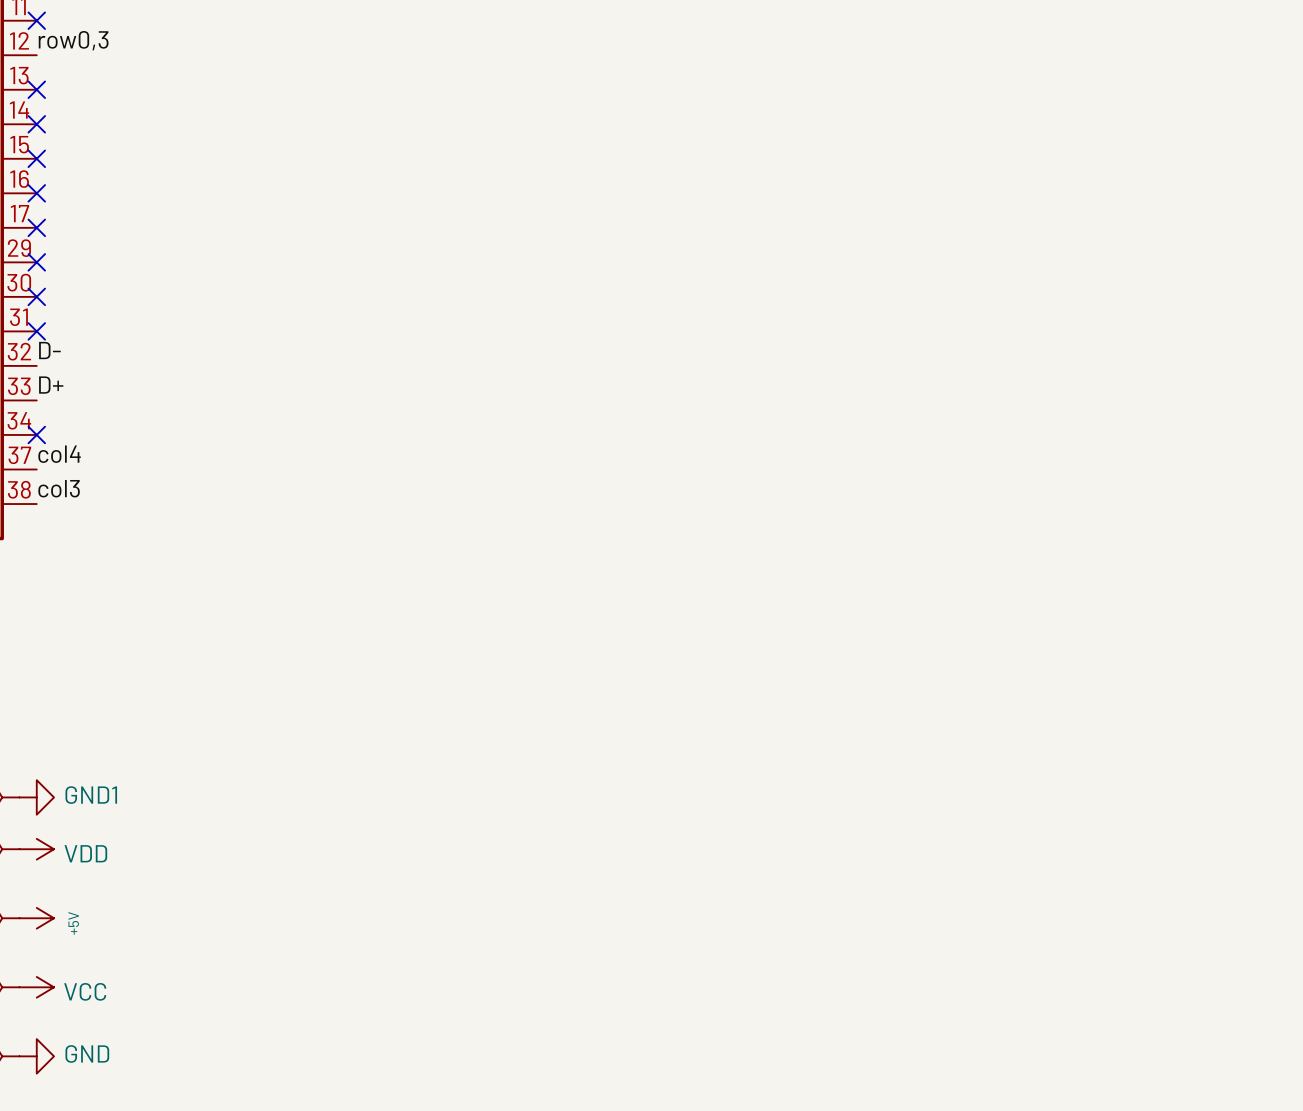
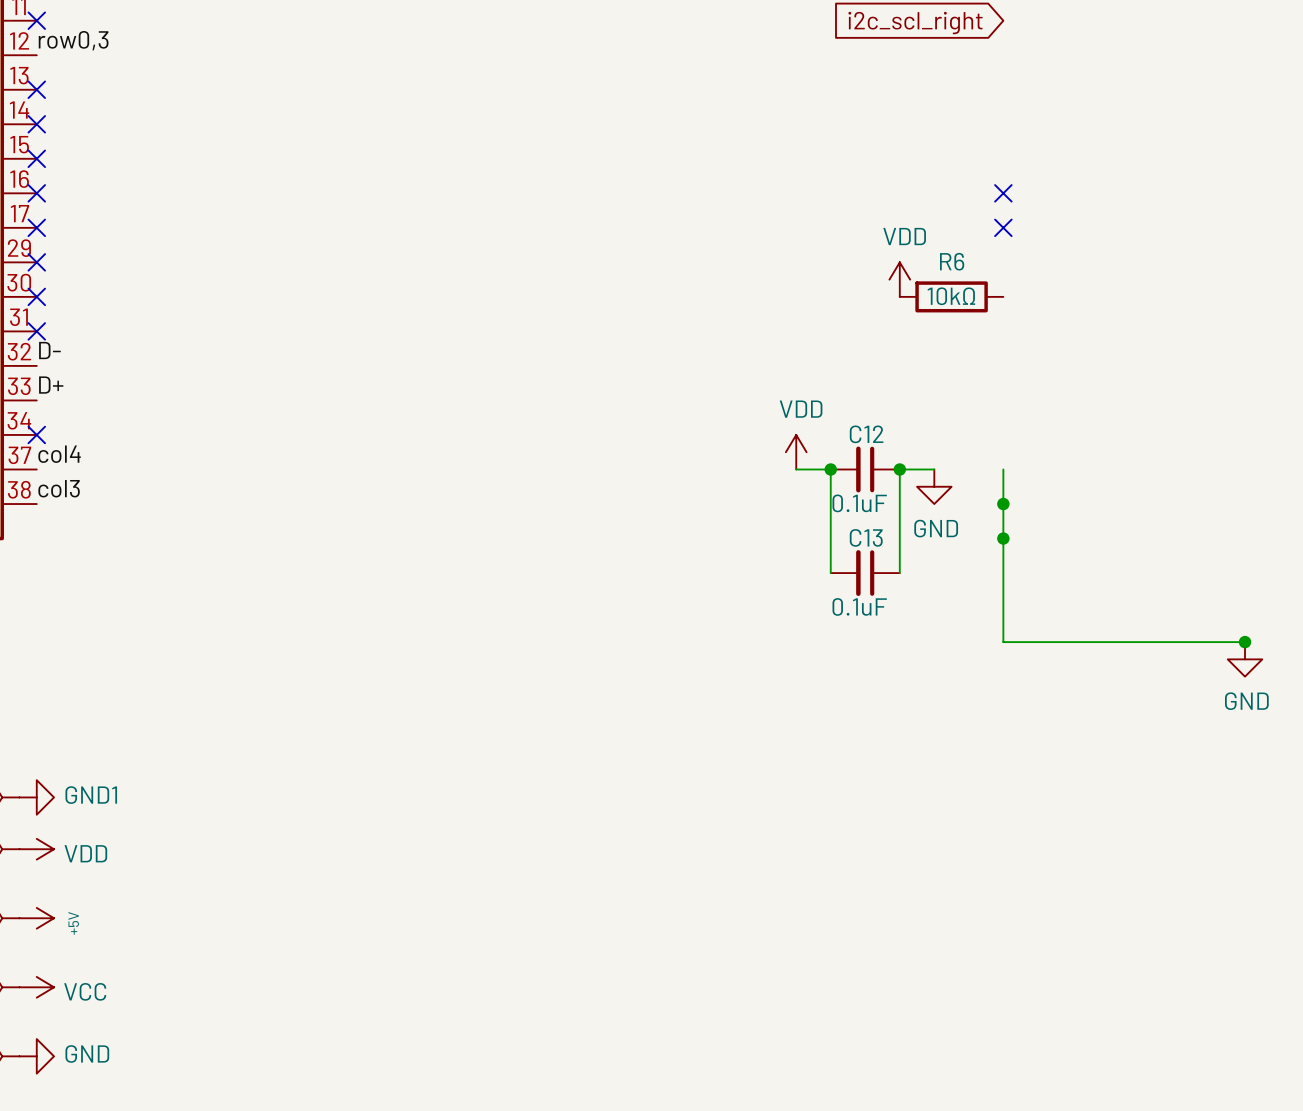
global label: none -> i2c_scl_right (915, 23)
no-connect mark: none -> (1003, 193)
no-connect mark: none -> (1003, 227)
power symbol: none -> VDD (899, 279)
R6: none -> 10kΩ (951, 296)
power symbol: none -> VDD (796, 452)
wire: none -> (796, 469) (830, 469) (830, 573)
junction: none -> (830, 469)
C12: none -> 0.1uF (865, 469)
junction: none -> (899, 469)
wire: none -> (934, 469) (899, 469) (899, 573)
wire: none -> (1003, 469) (1003, 642) (1245, 642)
power symbol: none -> GND (934, 486)
junction: none -> (1003, 504)
junction: none -> (1003, 538)
C13: none -> 0.1uF (865, 573)
junction: none -> (1245, 642)
power symbol: none -> GND (1245, 659)

